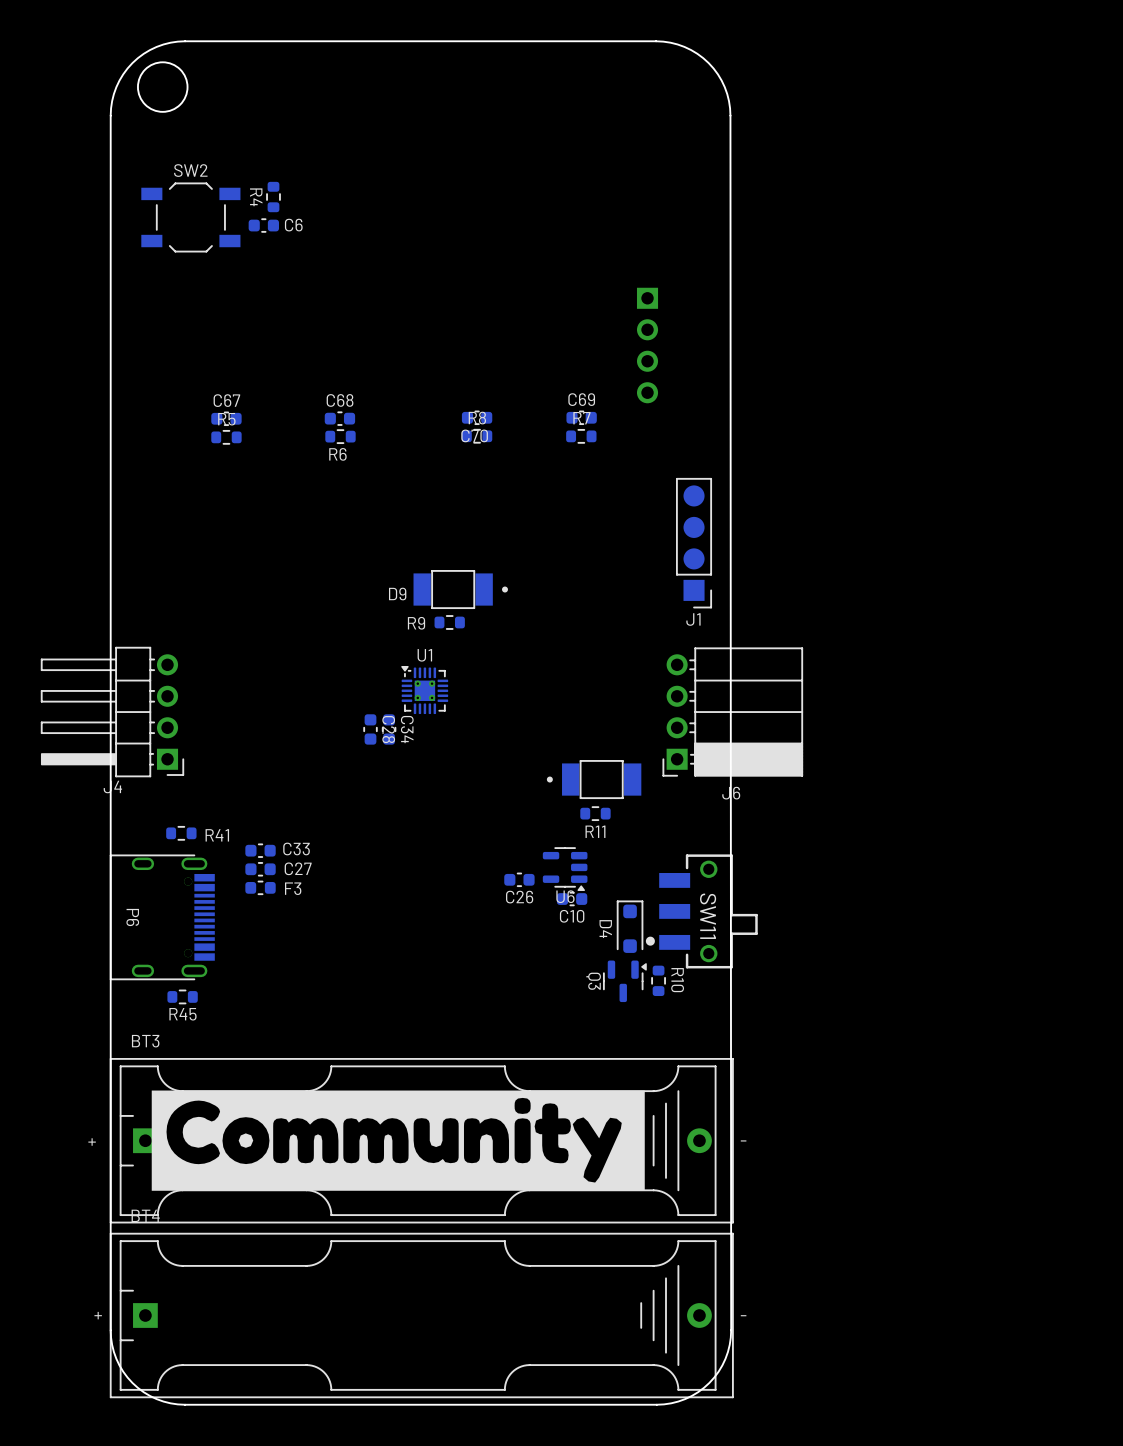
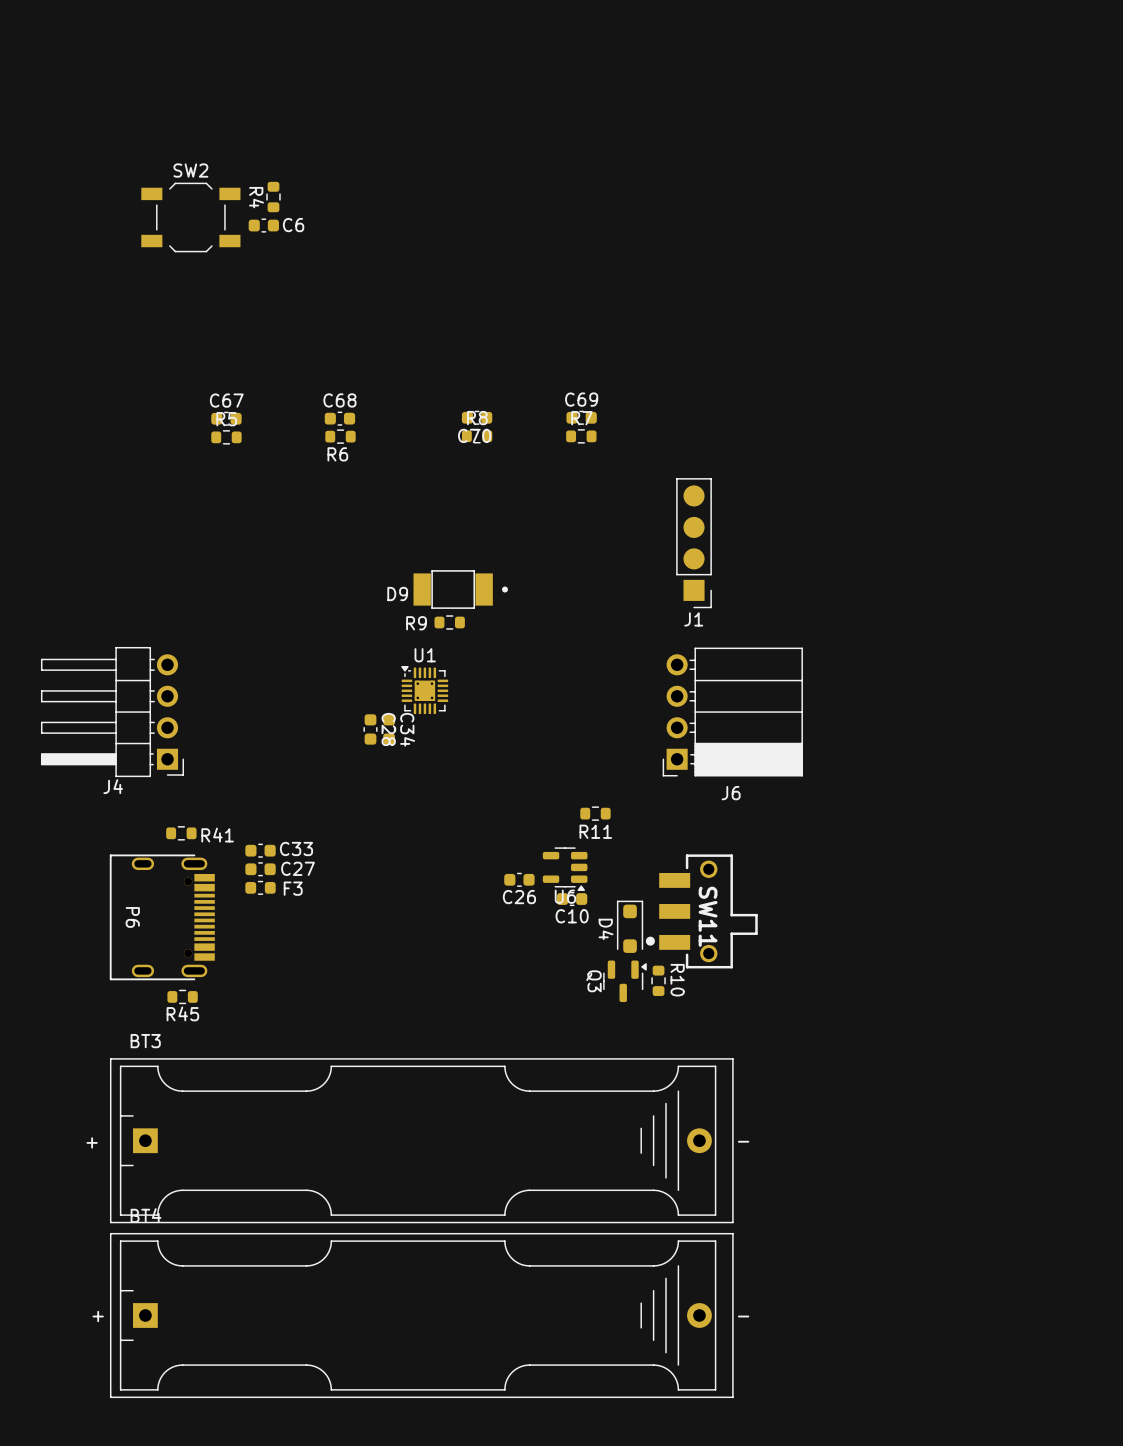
board edge: (656, 41) (177, 41) (163, 44) (143, 53) (127, 68) (116, 87) (110, 115) (110, 1330) (113, 1351) (123, 1371) (137, 1387) (156, 1399) (185, 1404) (664, 1404) (685, 1399) (703, 1387) (718, 1371) (725, 1358) (731, 1330) (730, 108) (721, 80) (703, 58) (677, 44) (656, 41) -> none
round board edge: [137, 61, 189, 113] -> none
part: (647, 345) -> none
part: (594, 779) -> none
drawing: [151, 1090, 645, 1191] -> none

